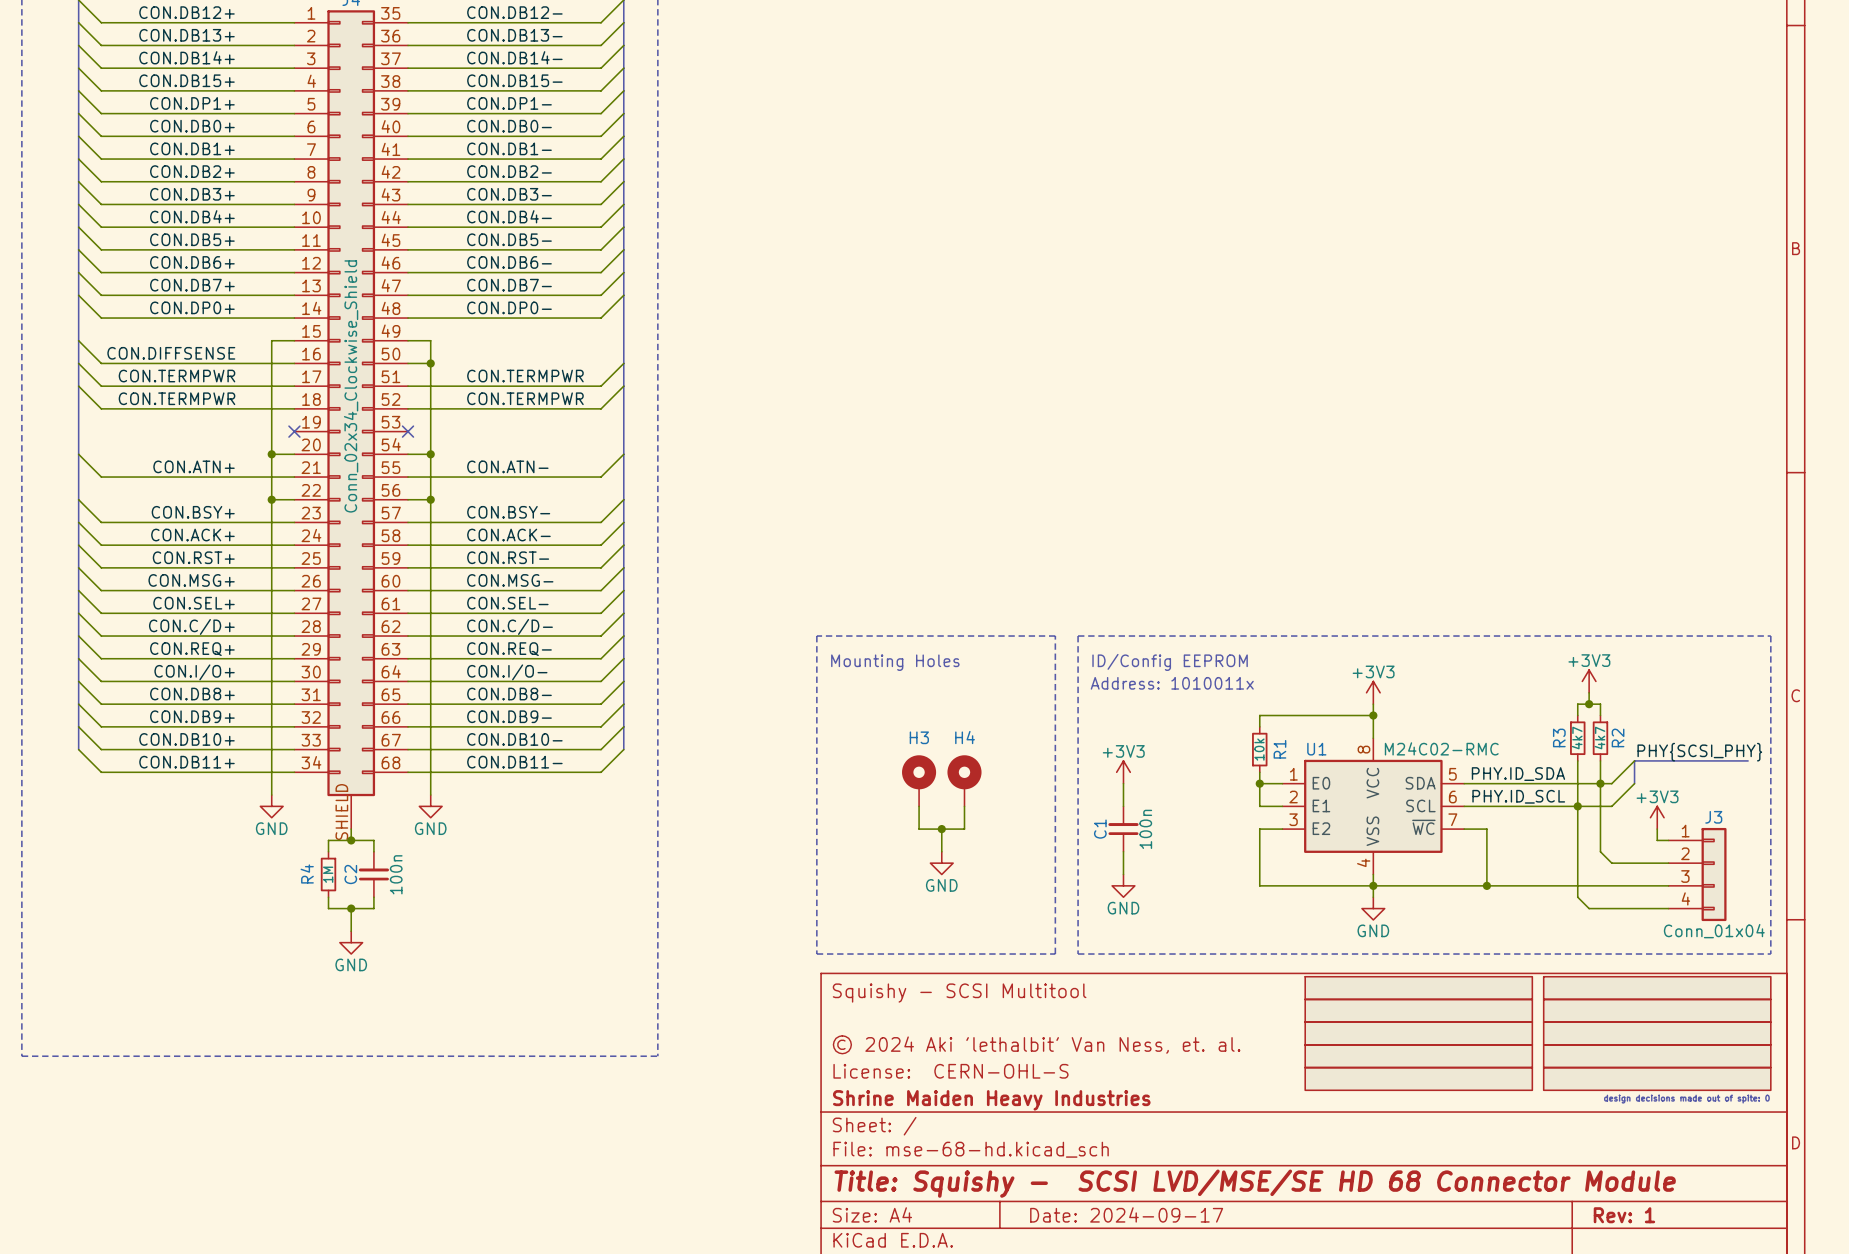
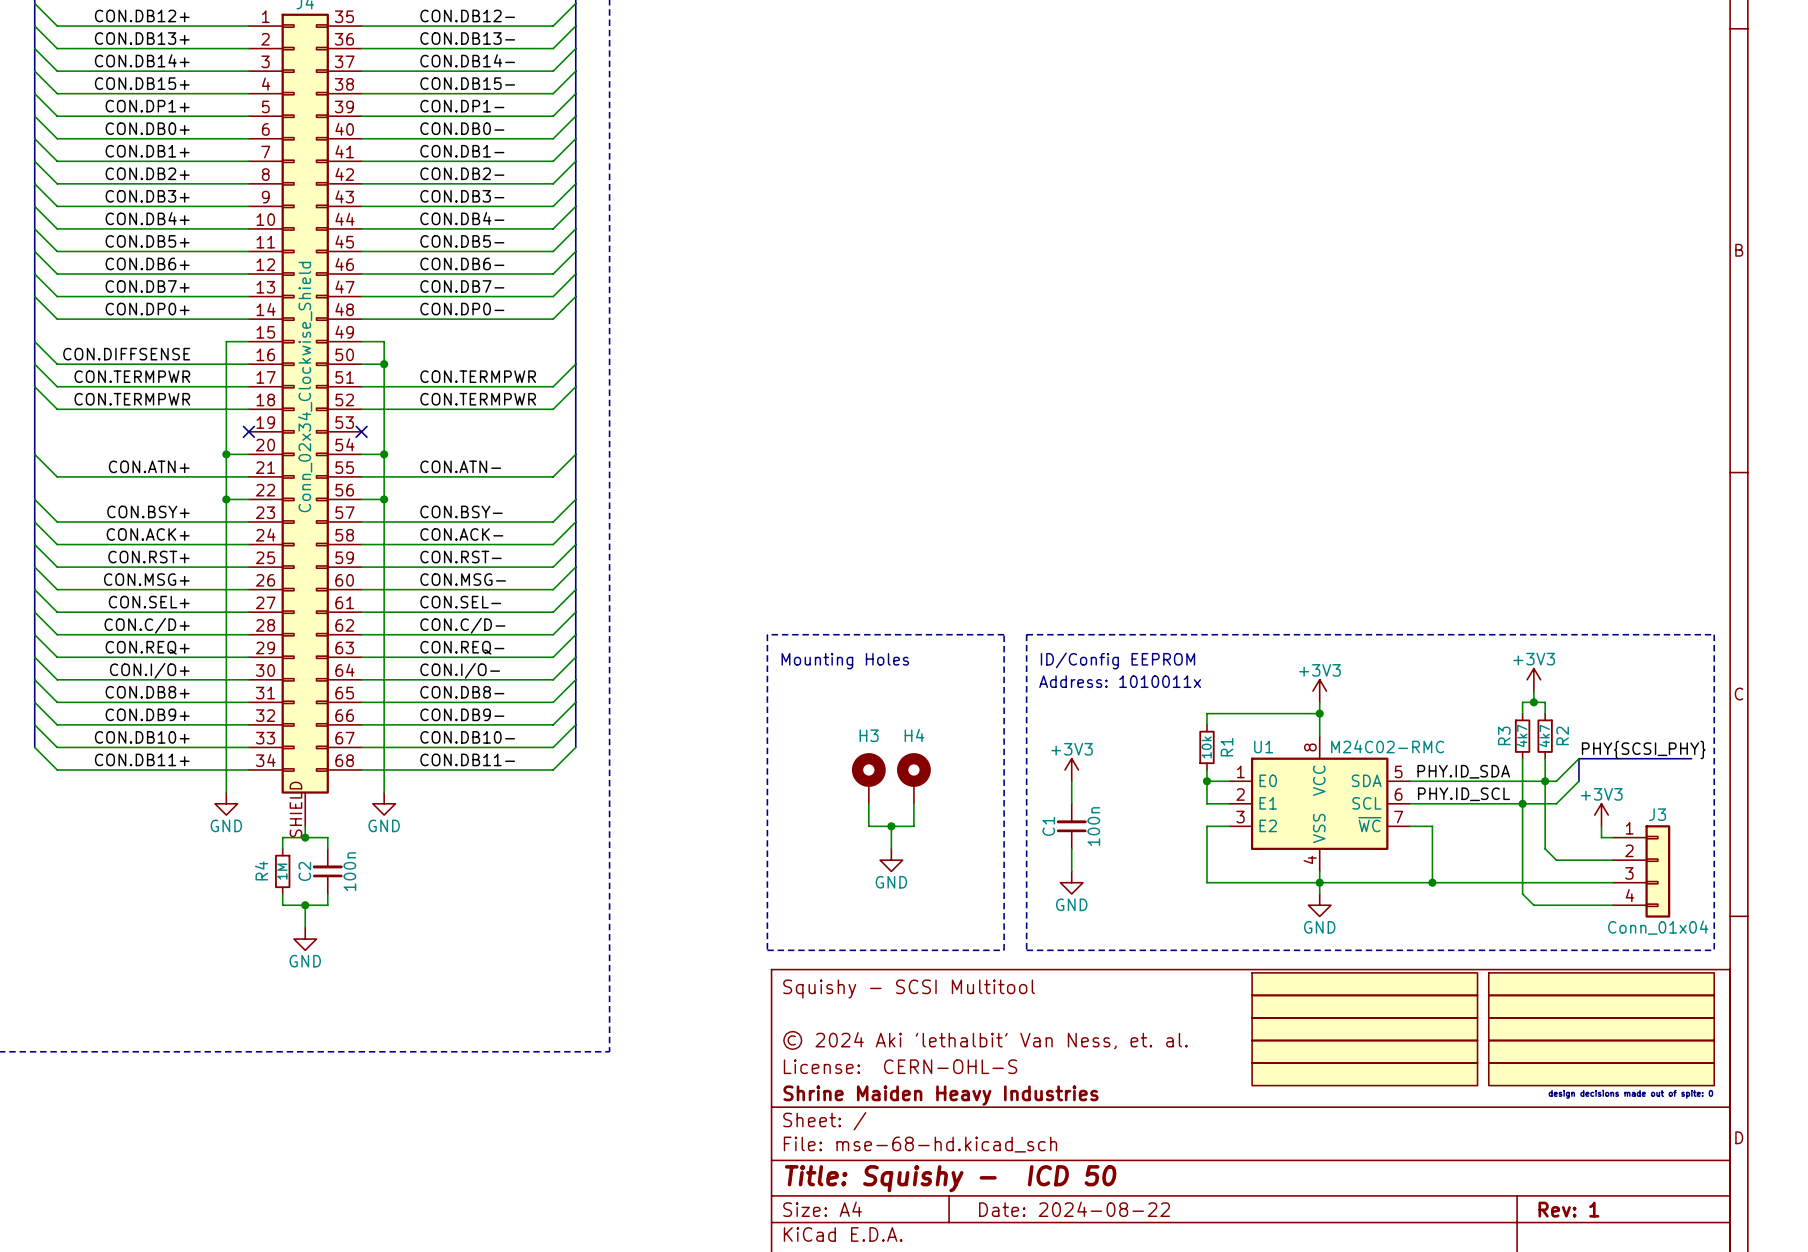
title block: Title: Squishy - SCSI LVD/MSE/SE HD 68 Connector Module (1255, 1183) -> Title: Squishy - ICD 50 (950, 1178)
title block: Date: 2024-09-17 (1126, 1214) -> Date: 2024-08-22 (1074, 1209)

